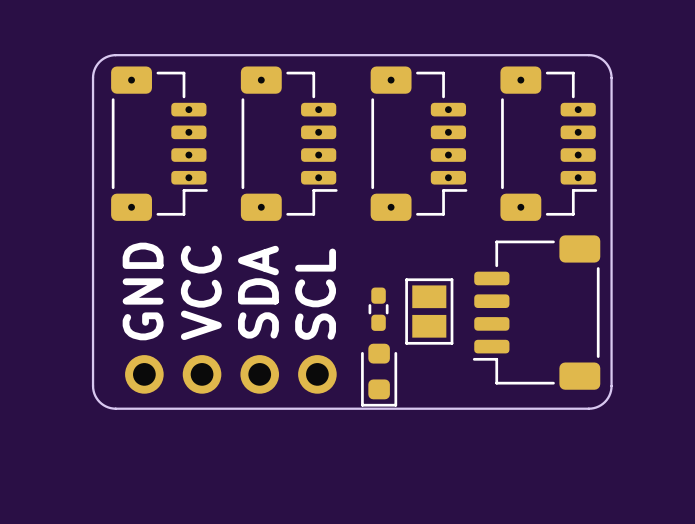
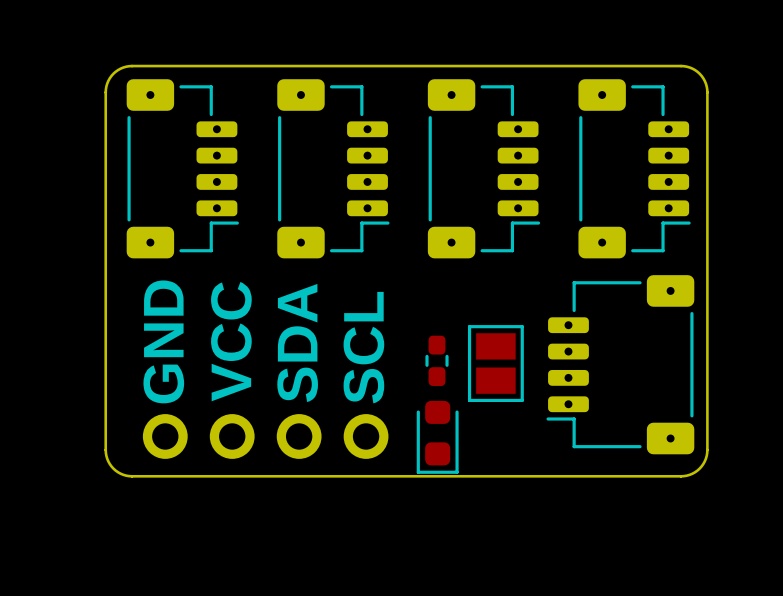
part footprint: [472, 235, 601, 390] -> [546, 275, 695, 455]

